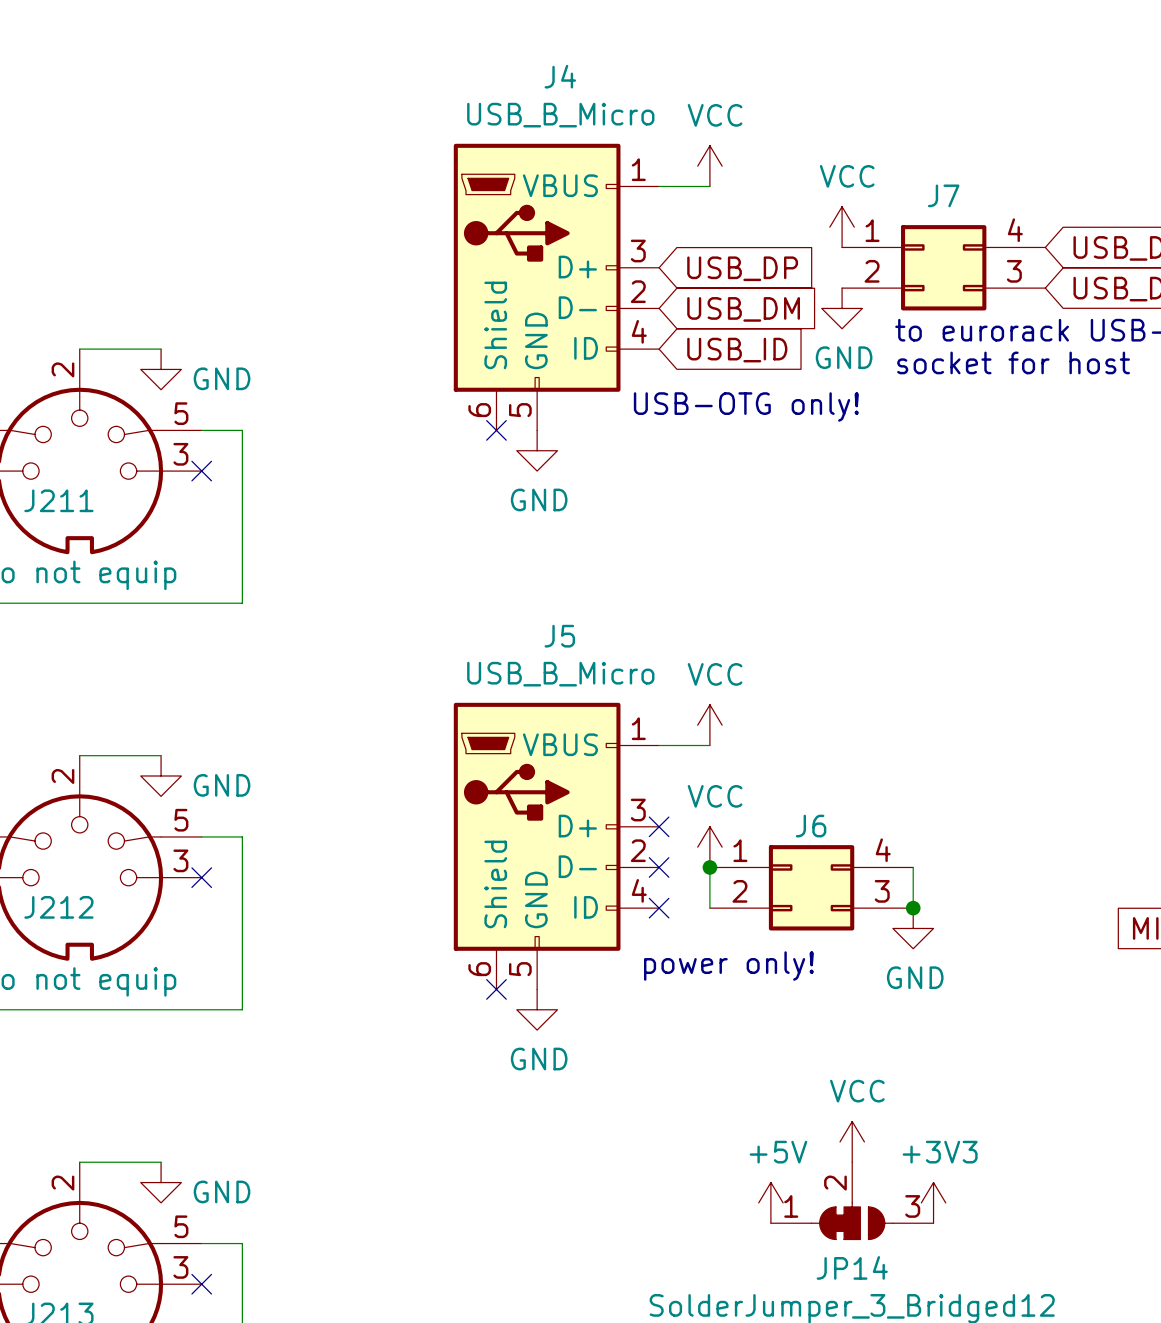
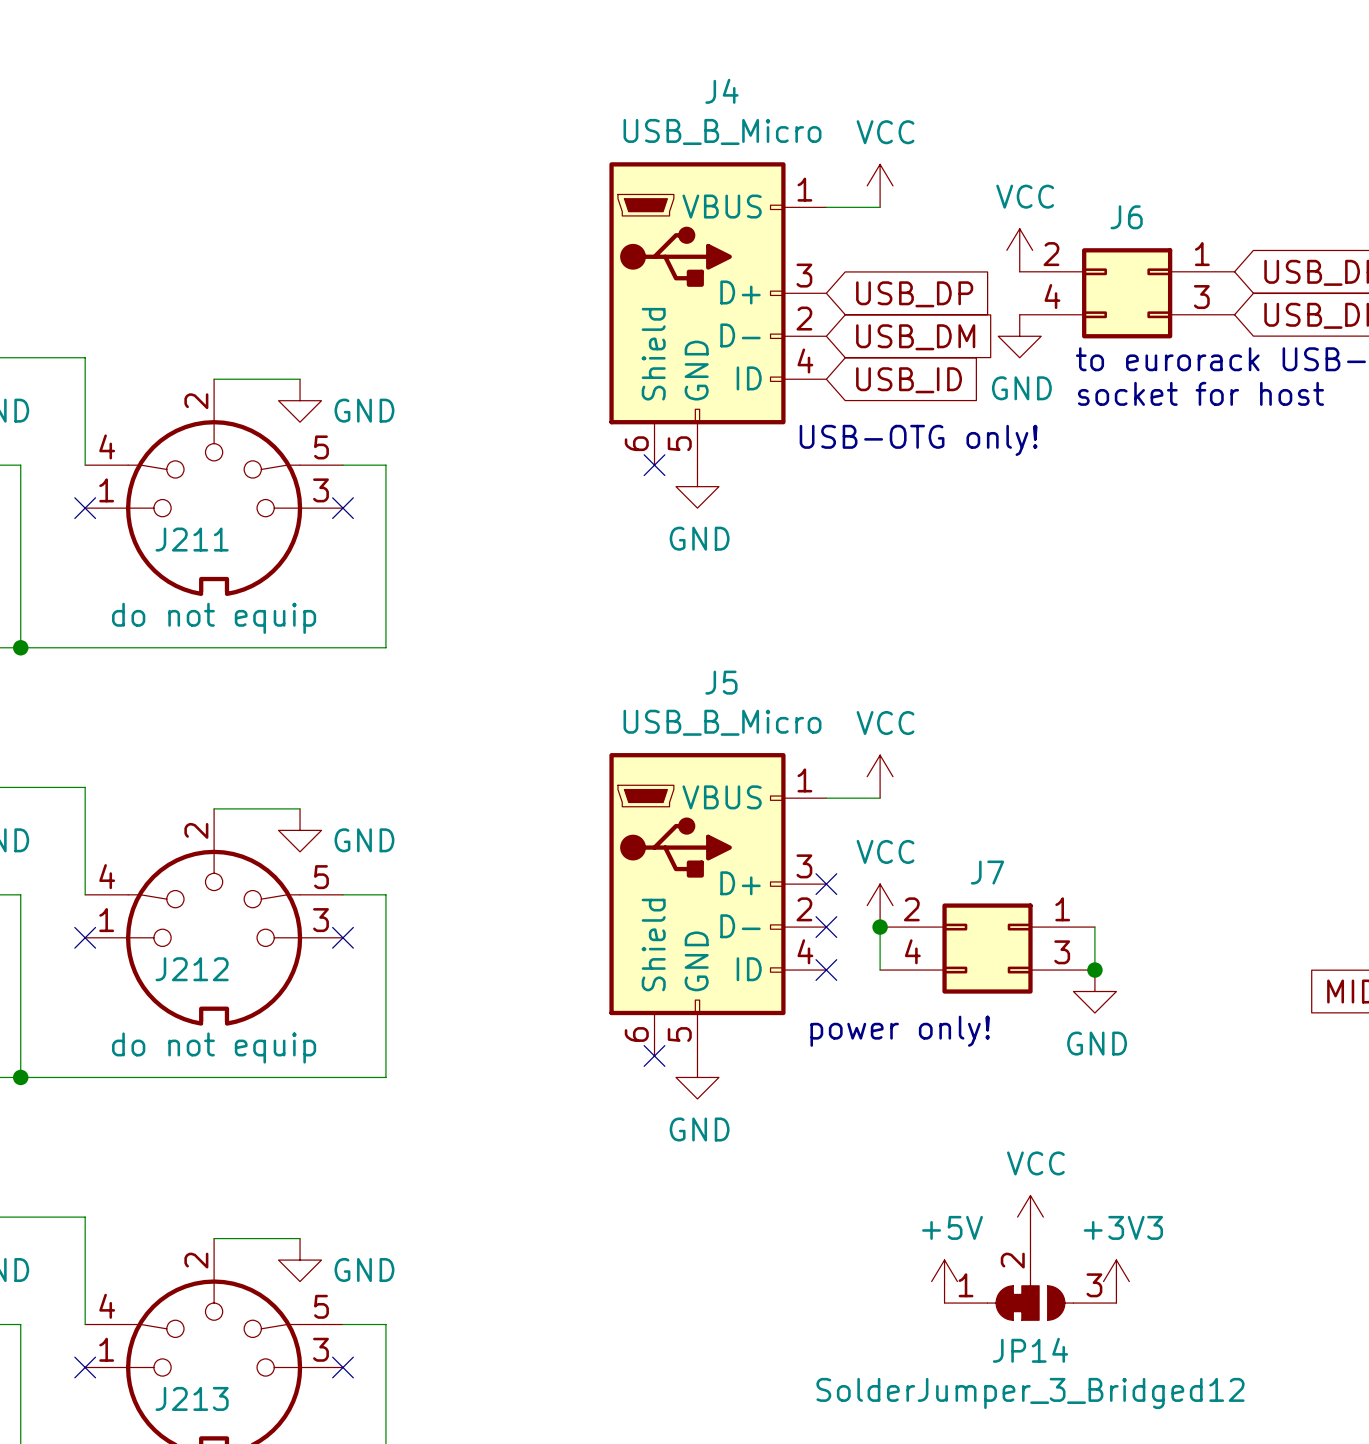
J7 pin number: 1 (872, 230) -> 2 (911, 909)
J7 pin number: 4 (1015, 230) -> 1 (1062, 909)
J7 position: (943, 267) -> (987, 948)
J7 pin number: 2 (872, 271) -> 4 (912, 951)
J6 name position: J6 (811, 826) -> J6 (1126, 217)
J6 pin number: 1 (740, 850) -> 2 (1051, 254)
J6 pin number: 4 (883, 850) -> 1 (1202, 254)
J6 position: (811, 887) -> (1127, 293)
J6 pin number: 2 (739, 891) -> 4 (1052, 296)

